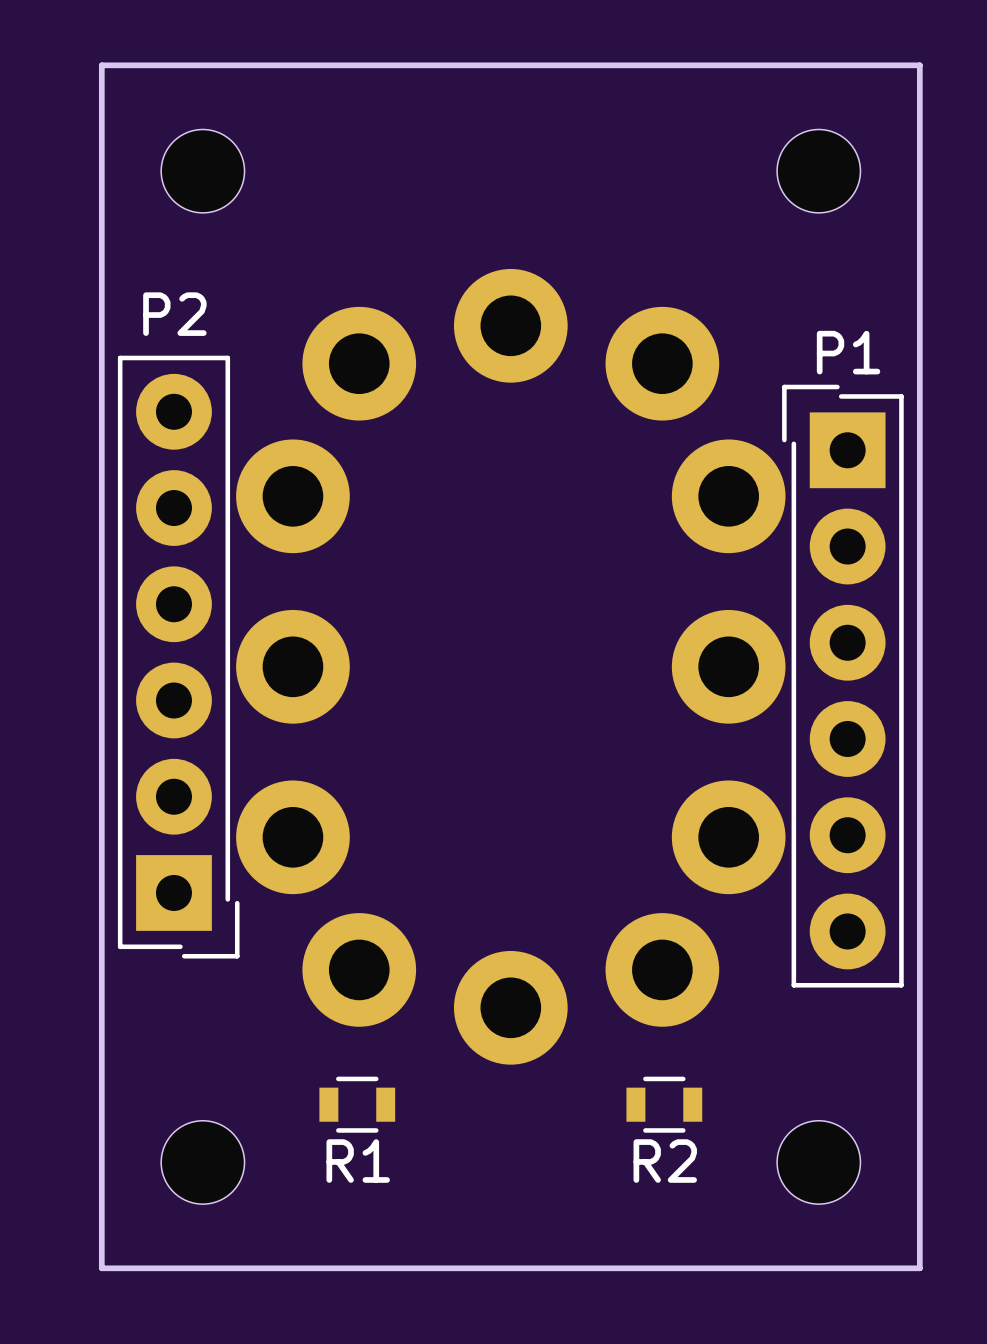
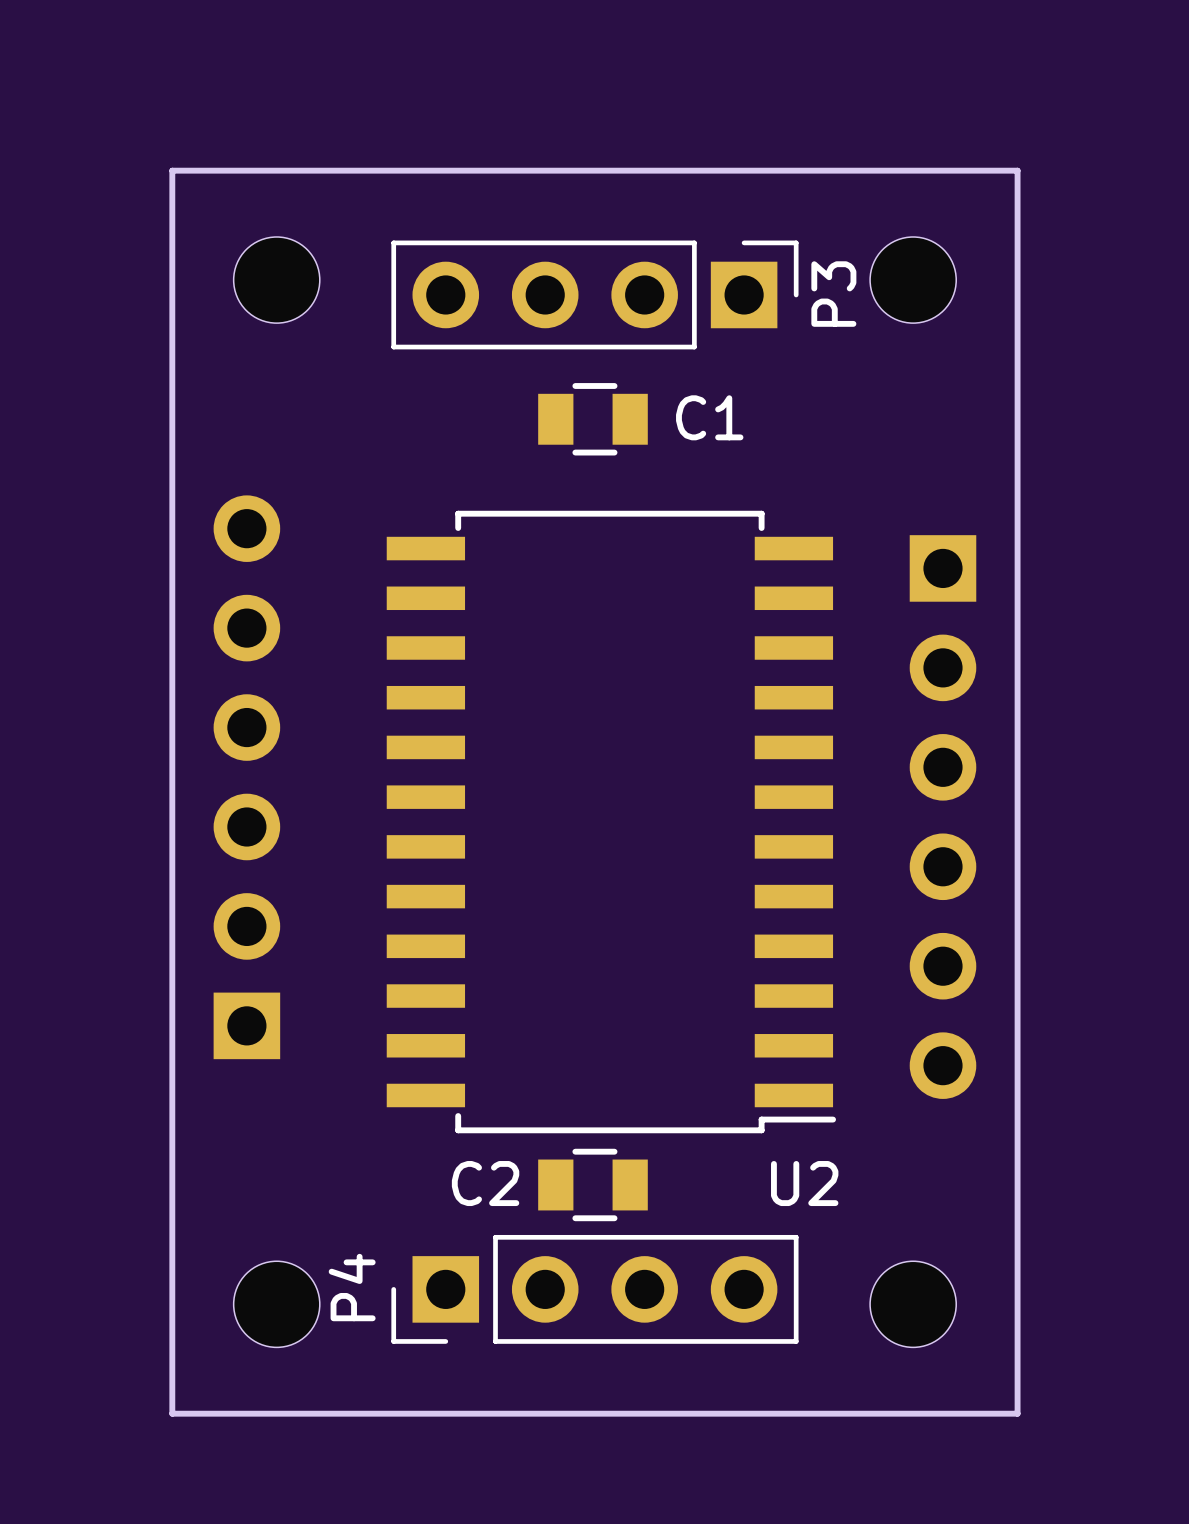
P3: none -> (594, 294)
C1: none -> (592, 419)
part: none -> (246, 777)
P2: (178, 657) -> none
part: (510, 666) -> none
P1: (842, 686) -> none
part: none -> (942, 817)
U2: none -> (611, 822)
C2: none -> (592, 1184)
R1: (357, 1104) -> none
R2: (664, 1104) -> none
P4: none -> (594, 1289)

